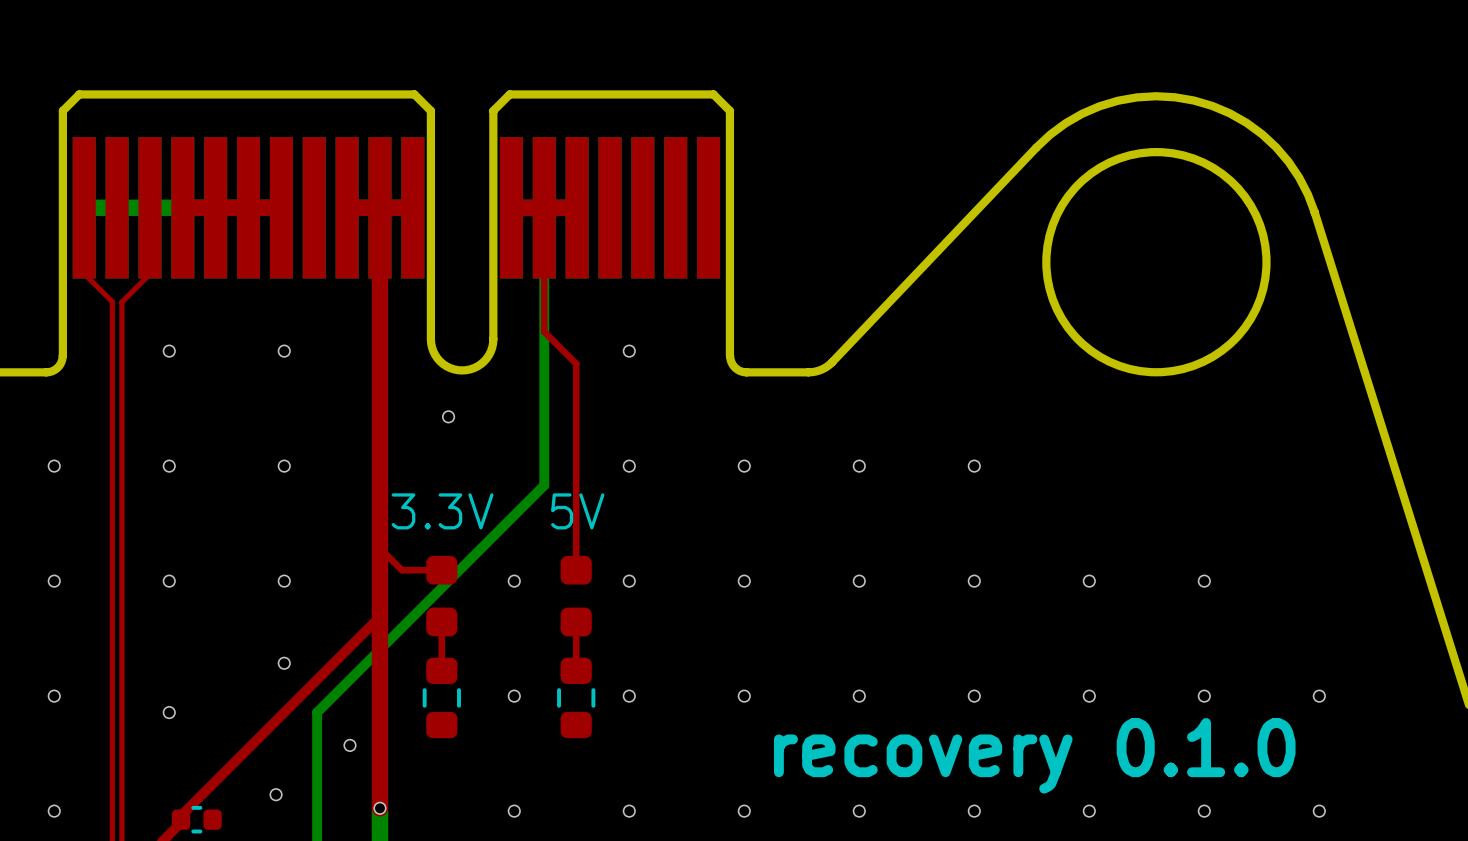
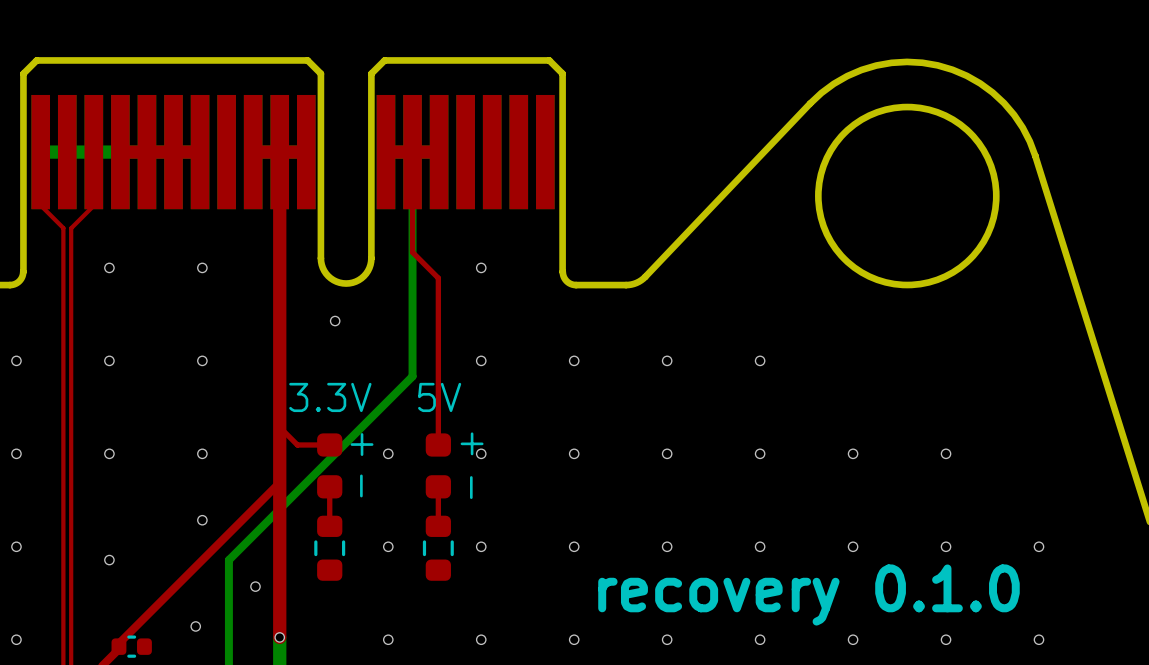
part text: none -> + (472, 443)
part text: none -> + (362, 444)
part text: none -> - (361, 485)
part text: none -> - (471, 487)

